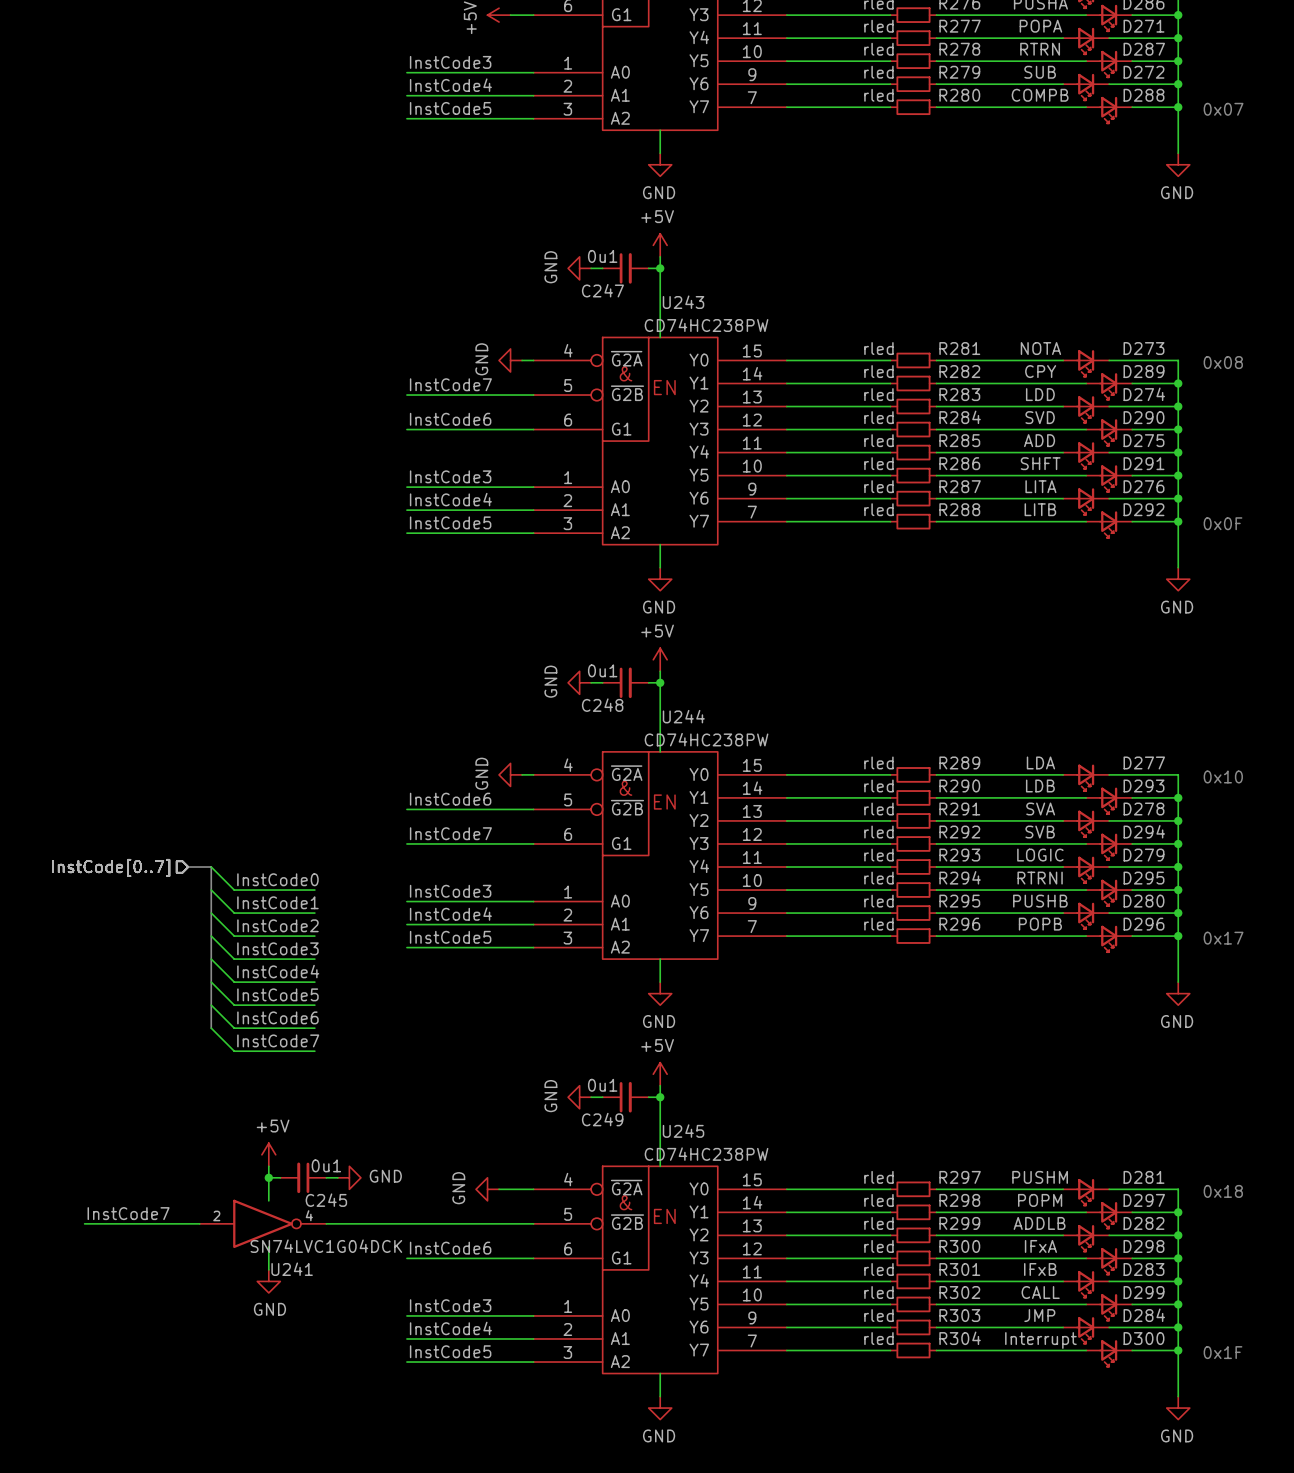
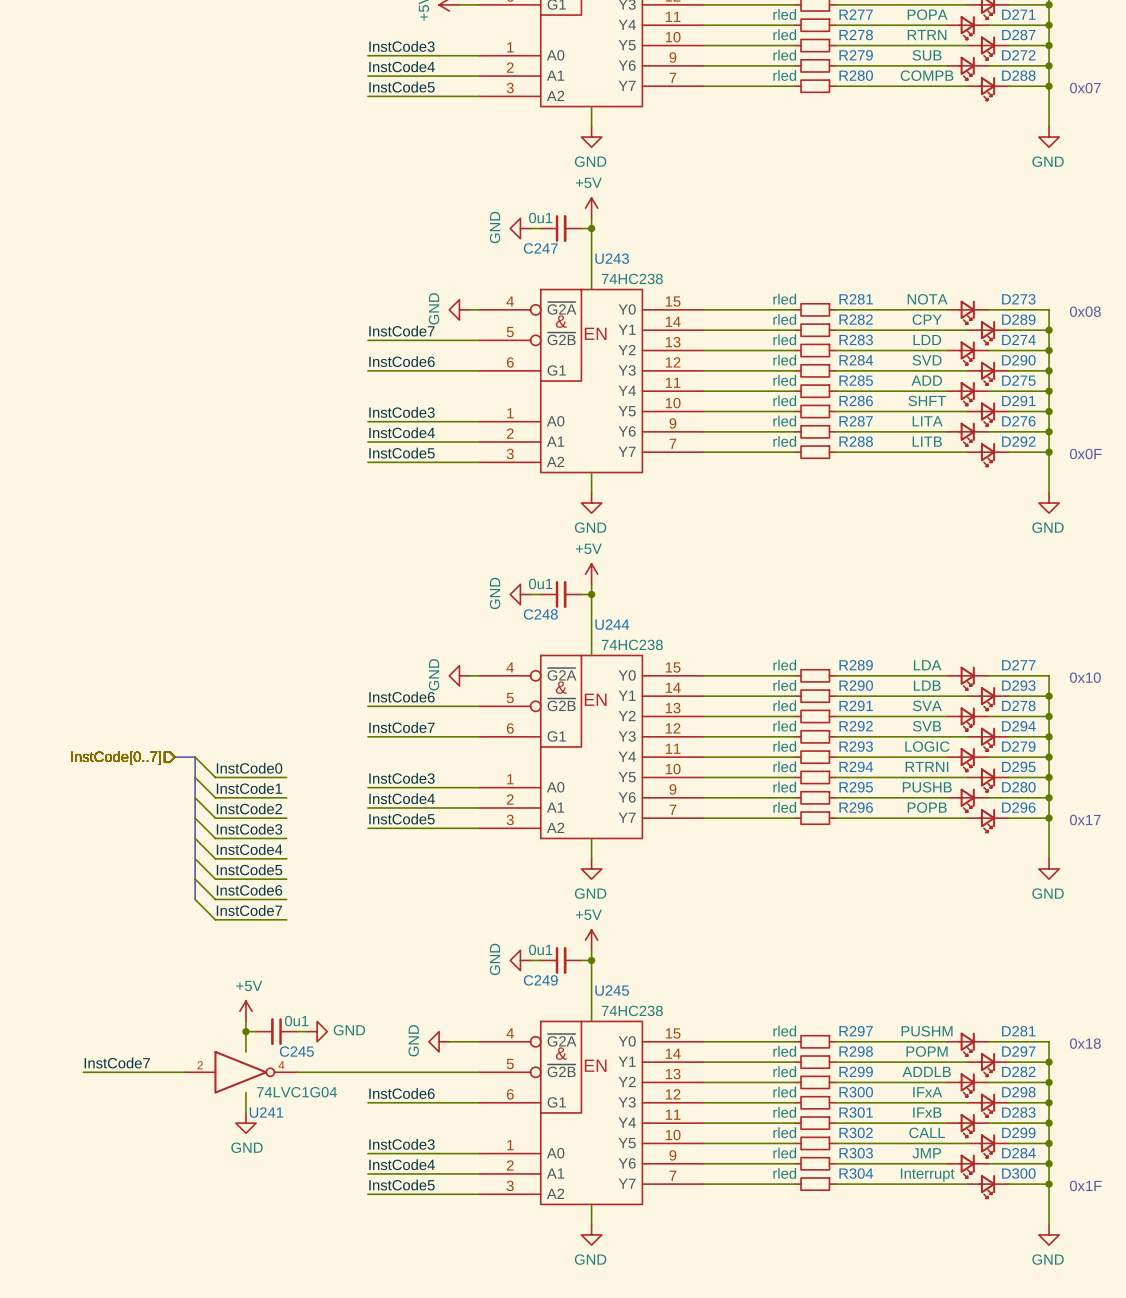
U243 value: CD74HC238PW (706, 325) -> 74HC238 (632, 278)
U244 value: CD74HC238PW (706, 739) -> 74HC238 (632, 644)
U245 value: CD74HC238PW (706, 1154) -> 74HC238 (632, 1010)
U241 value: SN74LVC1G04DCK (326, 1246) -> 74LVC1G04 (296, 1092)

